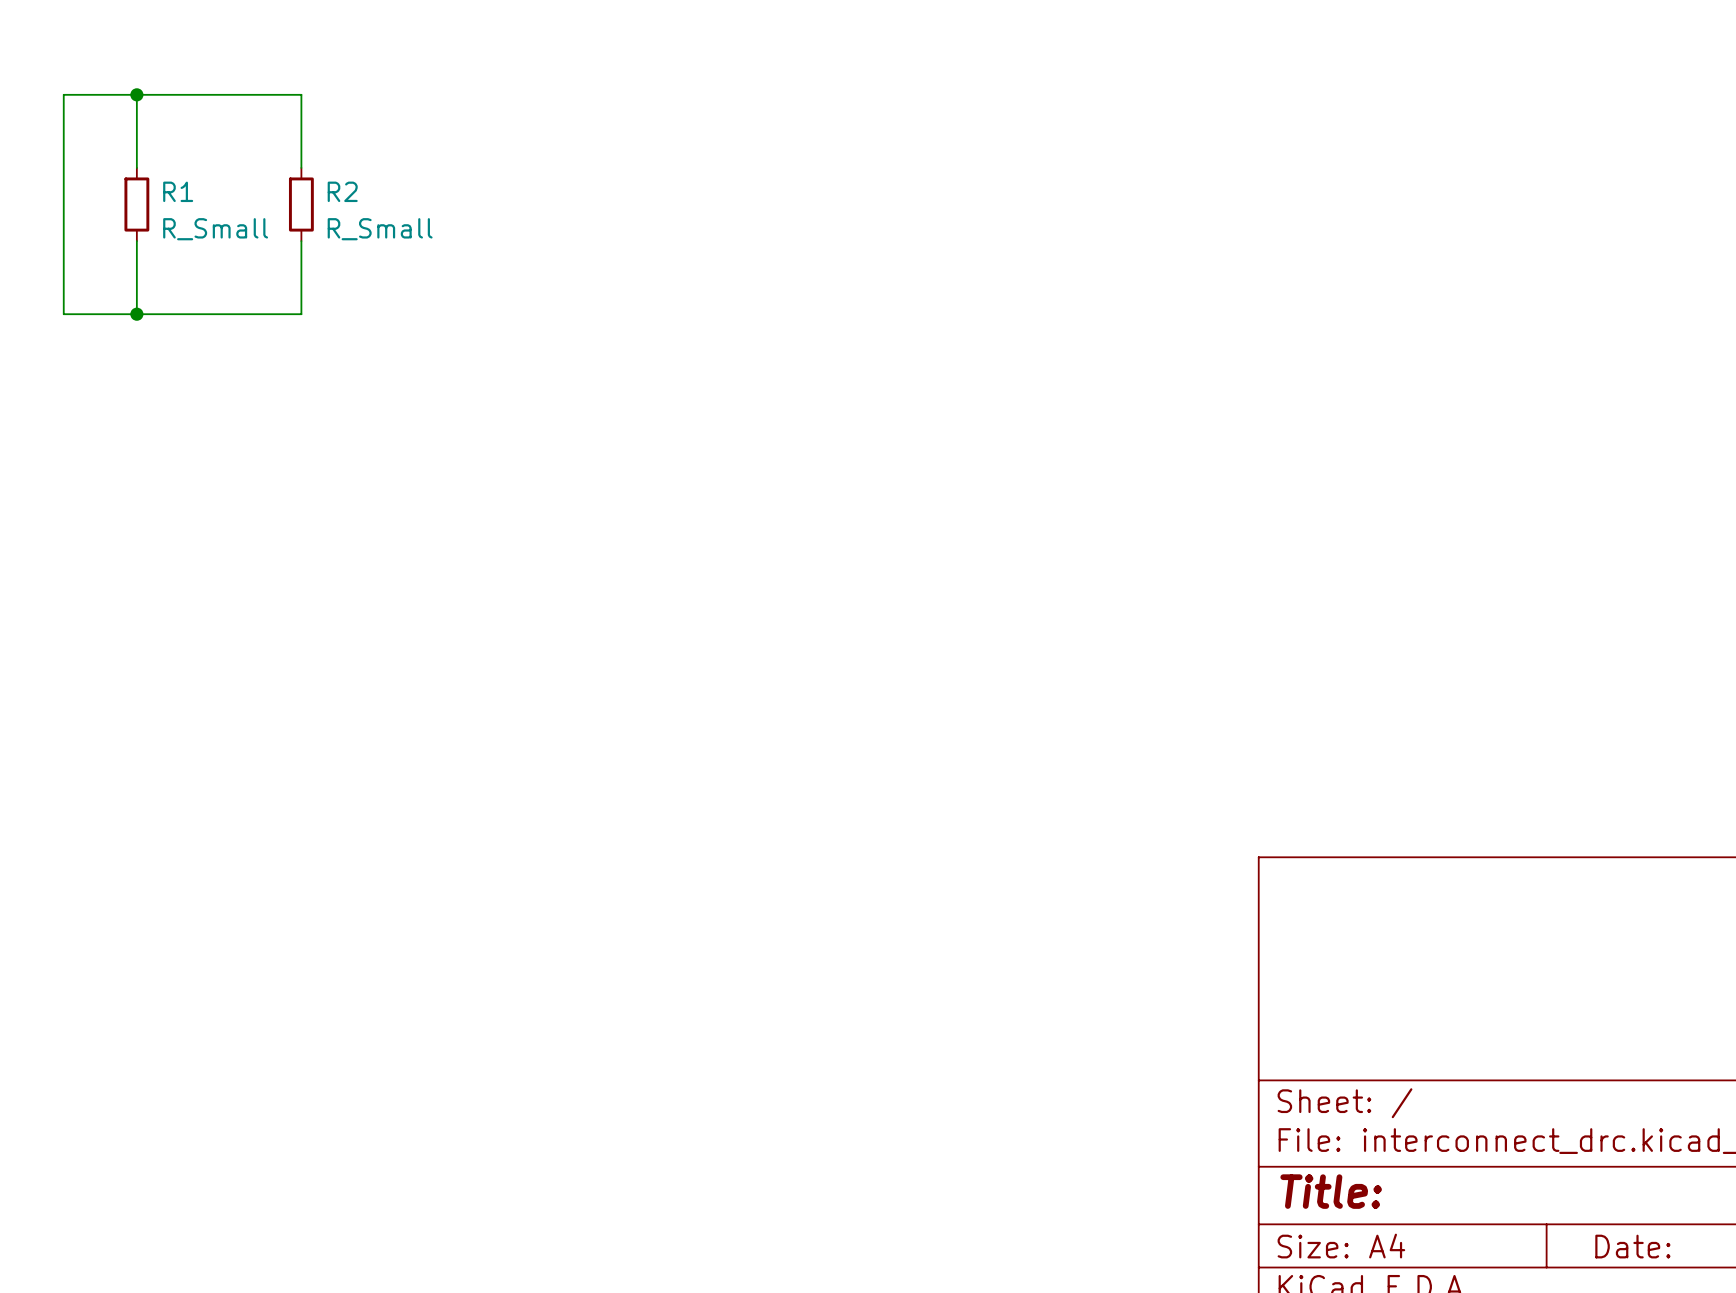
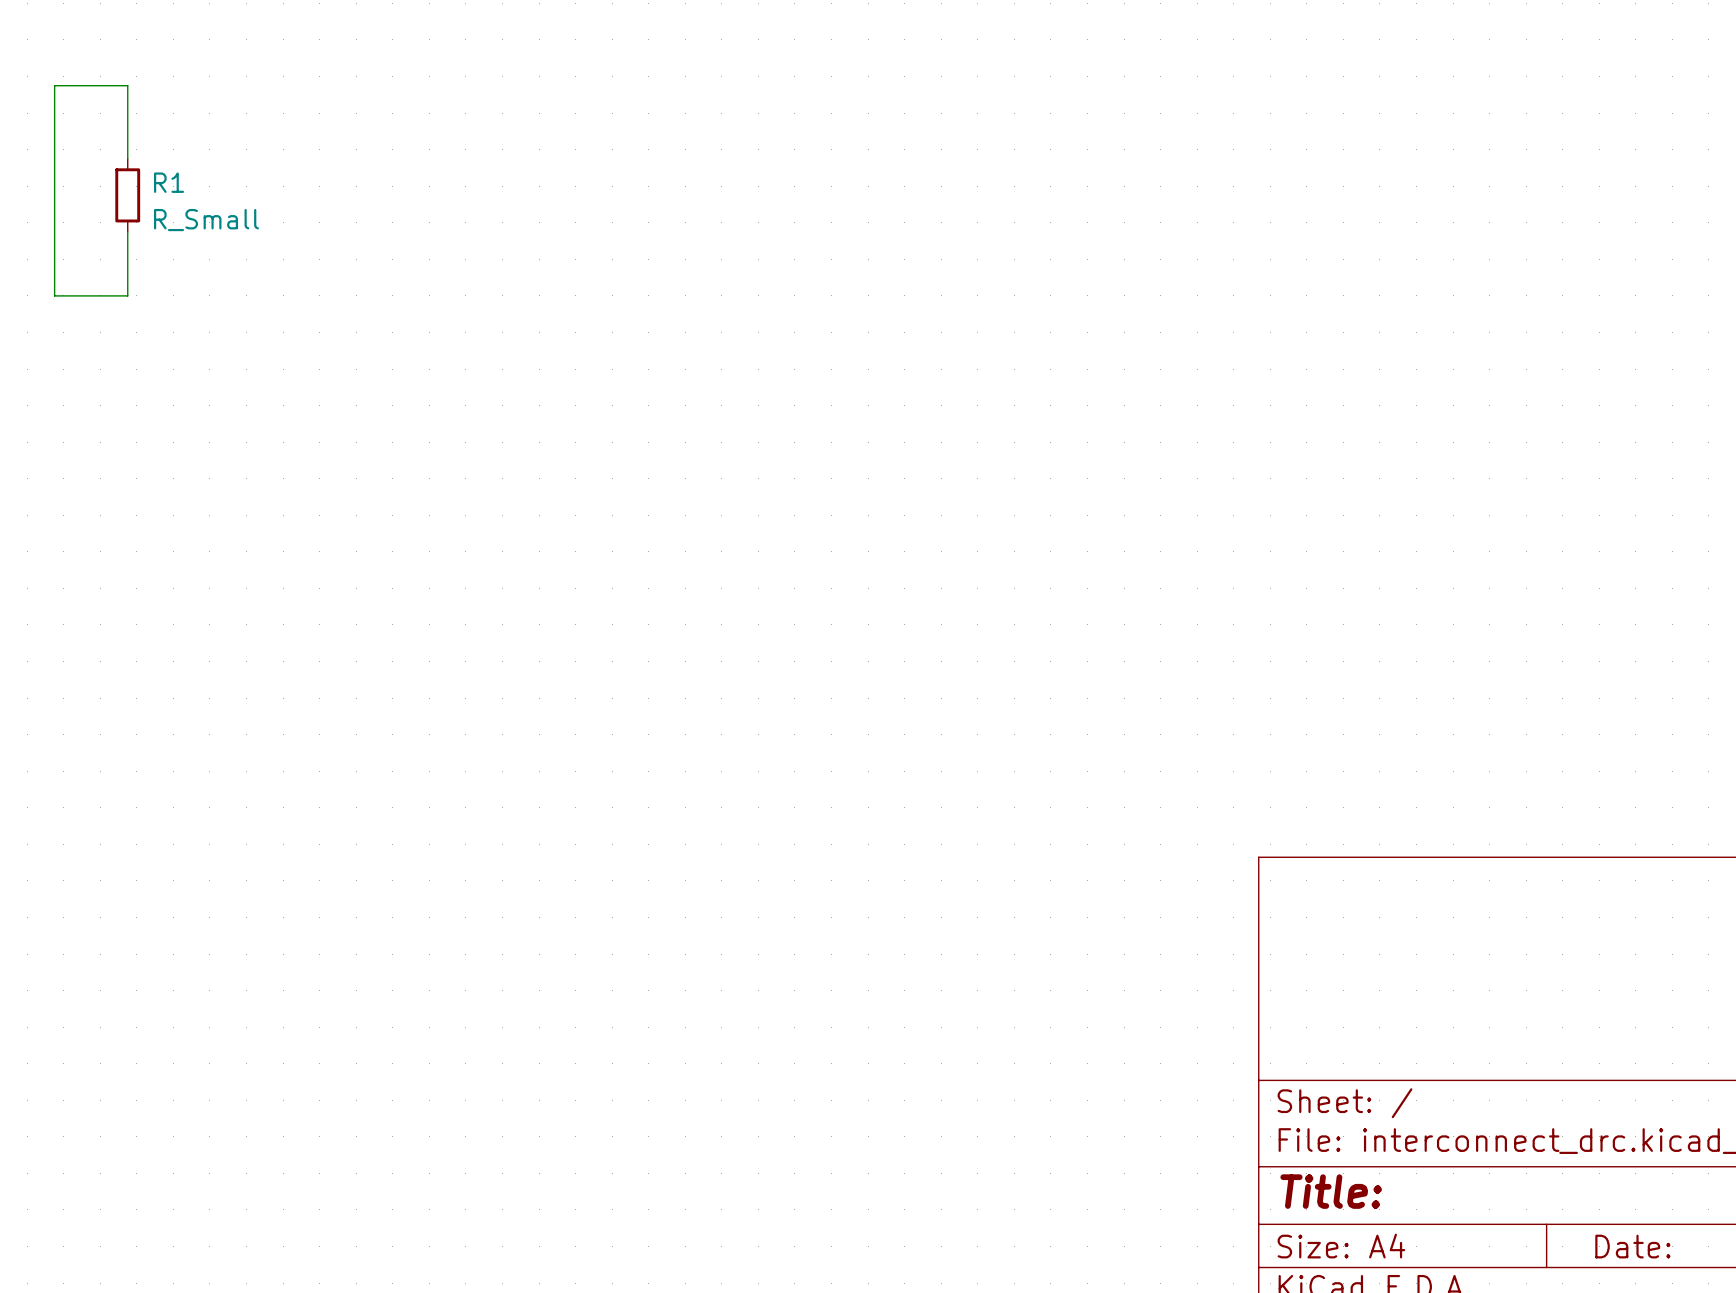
wire: (136, 94) (136, 167) -> none
junction: (136, 94) -> none
wire: none -> (127, 158) (127, 85) (54, 85) (54, 295) (127, 295) (127, 231)
wire: (301, 167) (301, 94) (63, 94) (63, 314) (301, 314) (301, 241) -> none
R1 position: (136, 204) -> (127, 195)
R2: R_Small (301, 204) -> none
wire: (136, 241) (136, 314) -> none
junction: (136, 314) -> none

